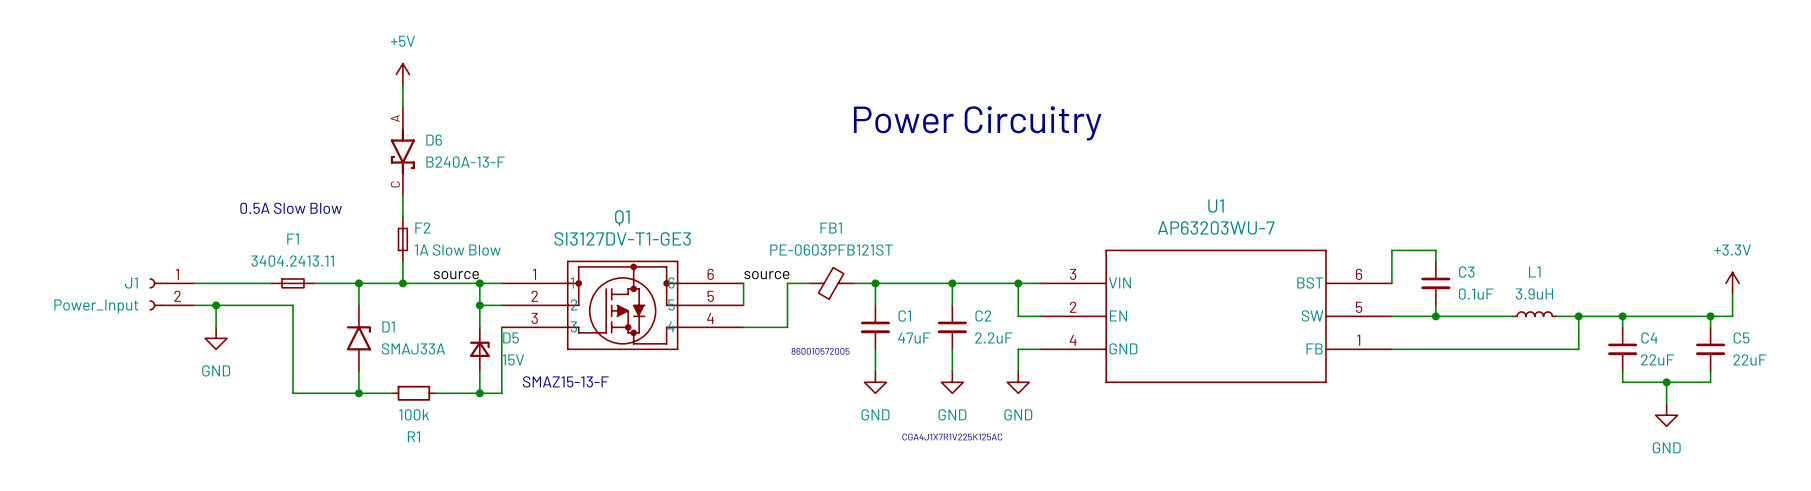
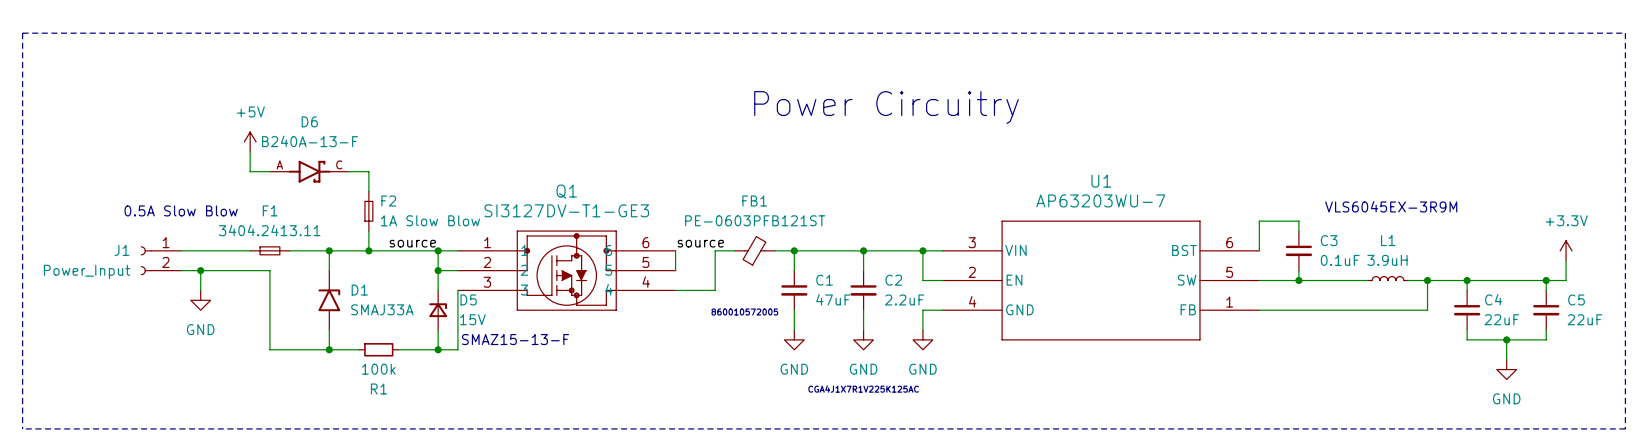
line: none -> (22, 33) (22, 428) (1625, 428) (1625, 33) (22, 33)
power symbol position: +5V (402, 74) -> +5V (250, 142)
wire: (402, 85) (402, 107) -> none
D6 name position: D6 (434, 140) -> D6 (309, 121)
D6 rotation: 0° (402, 151) -> 90° counterclockwise (309, 171)
D6 position: (402, 151) -> (309, 171)
D6 value position: B240A-13-F (465, 162) -> B240A-13-F (309, 141)
wire: none -> (250, 151) (250, 171) (269, 171)
wire: none -> (349, 171) (368, 171)
text position: 0.5A Slow Blow (291, 208) -> 0.5A Slow Blow (181, 210)
text: none -> VLS6045EX-3R9M (1391, 206)

